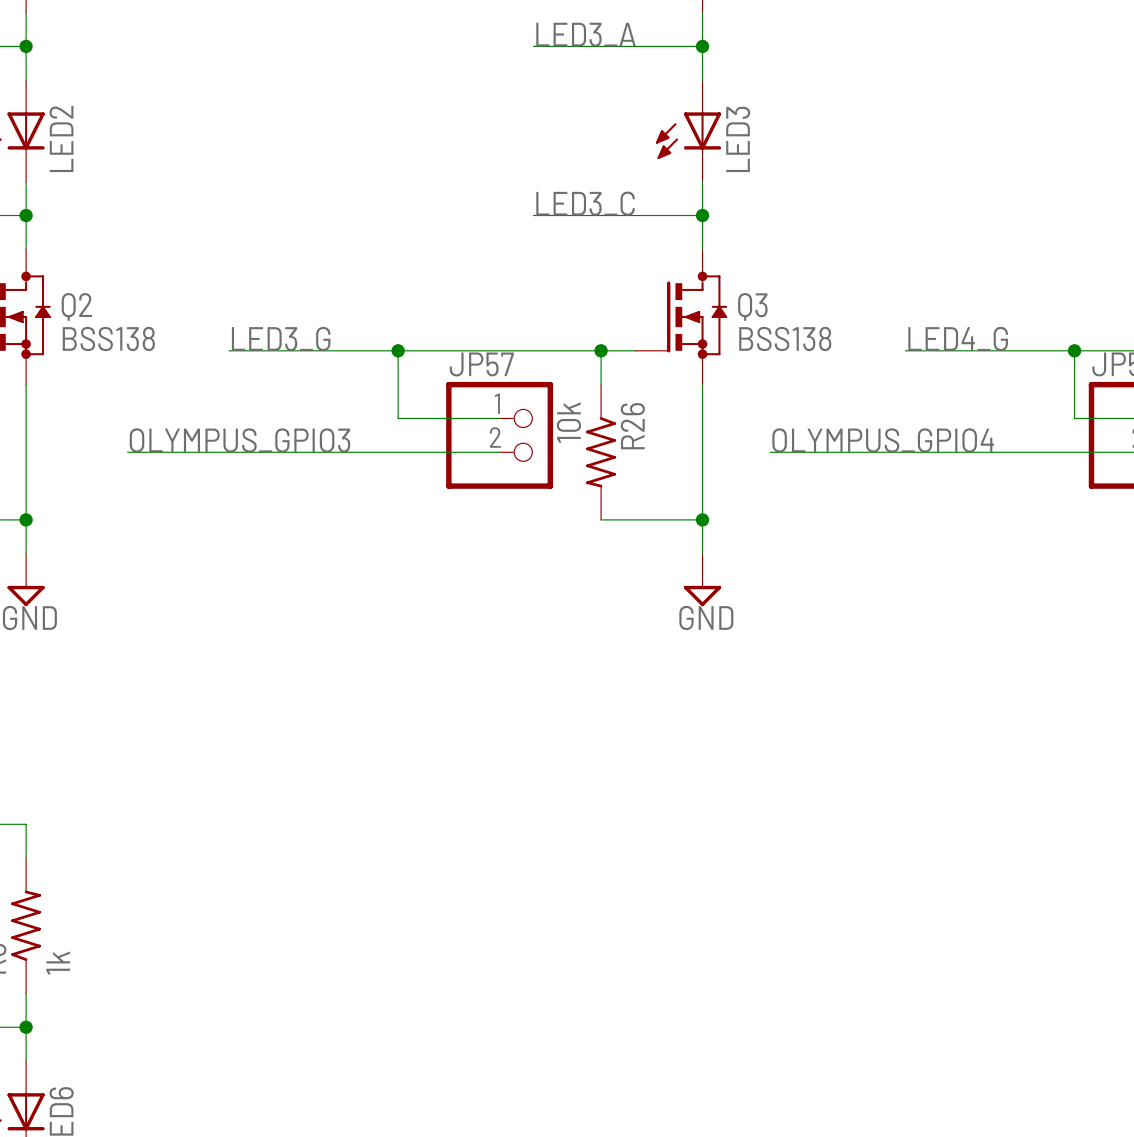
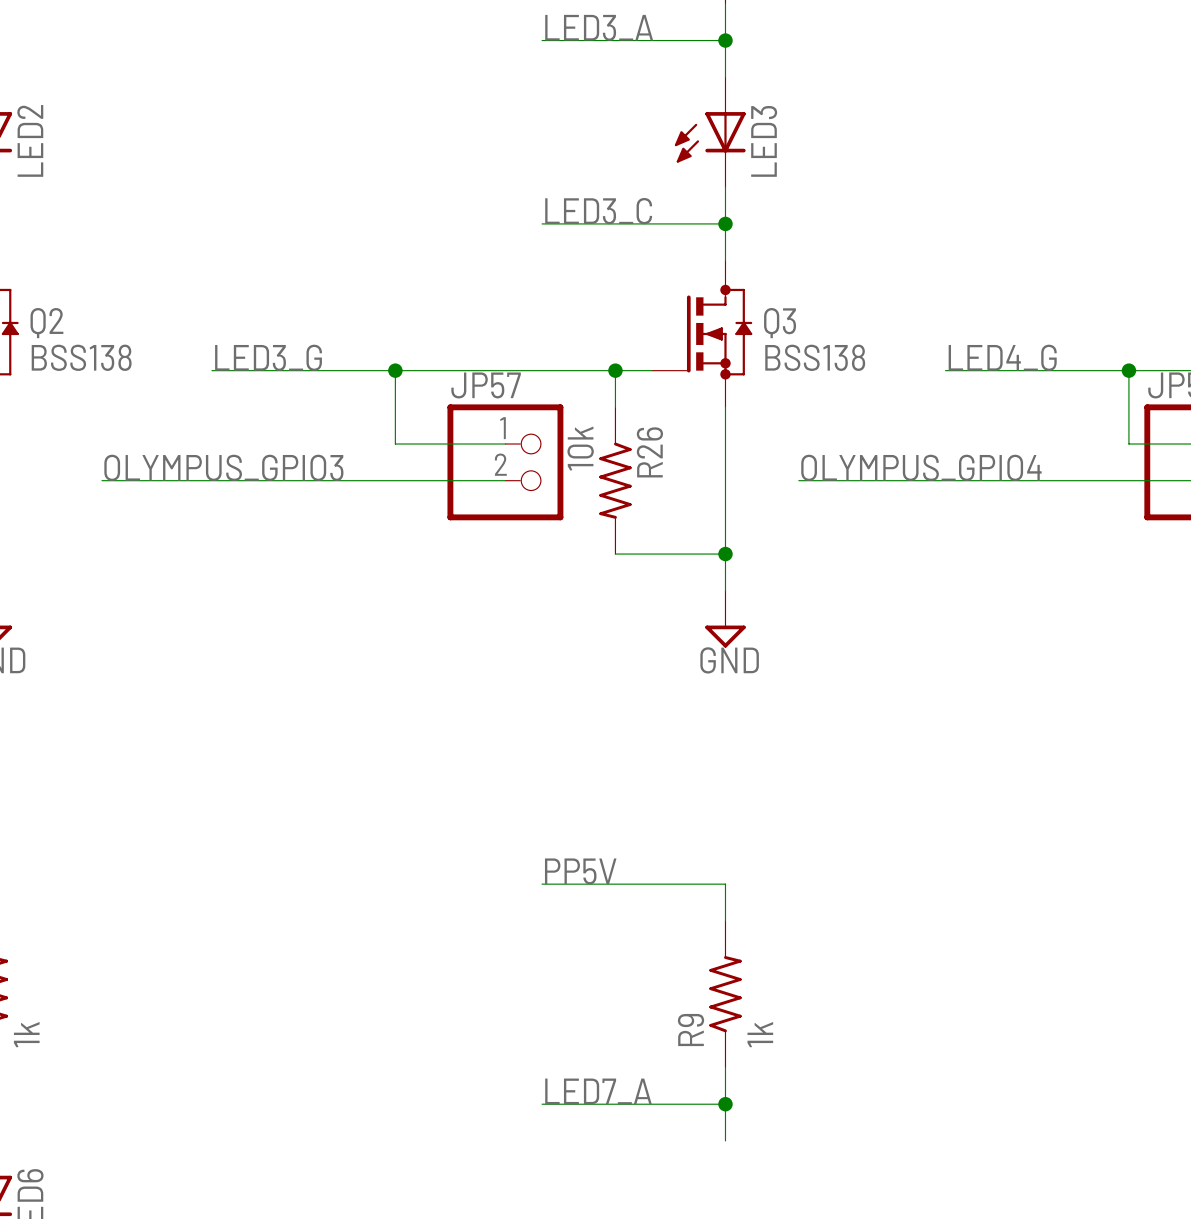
label: none -> PP5V (580, 871)
wire: none -> (542, 884) (725, 884) (725, 920)
R9: none -> 1k (725, 994)
wire: none -> (725, 1067) (725, 1140)
label: none -> LED7_A (598, 1091)
wire: none -> (542, 1104) (725, 1104)
junction: none -> (725, 1104)

